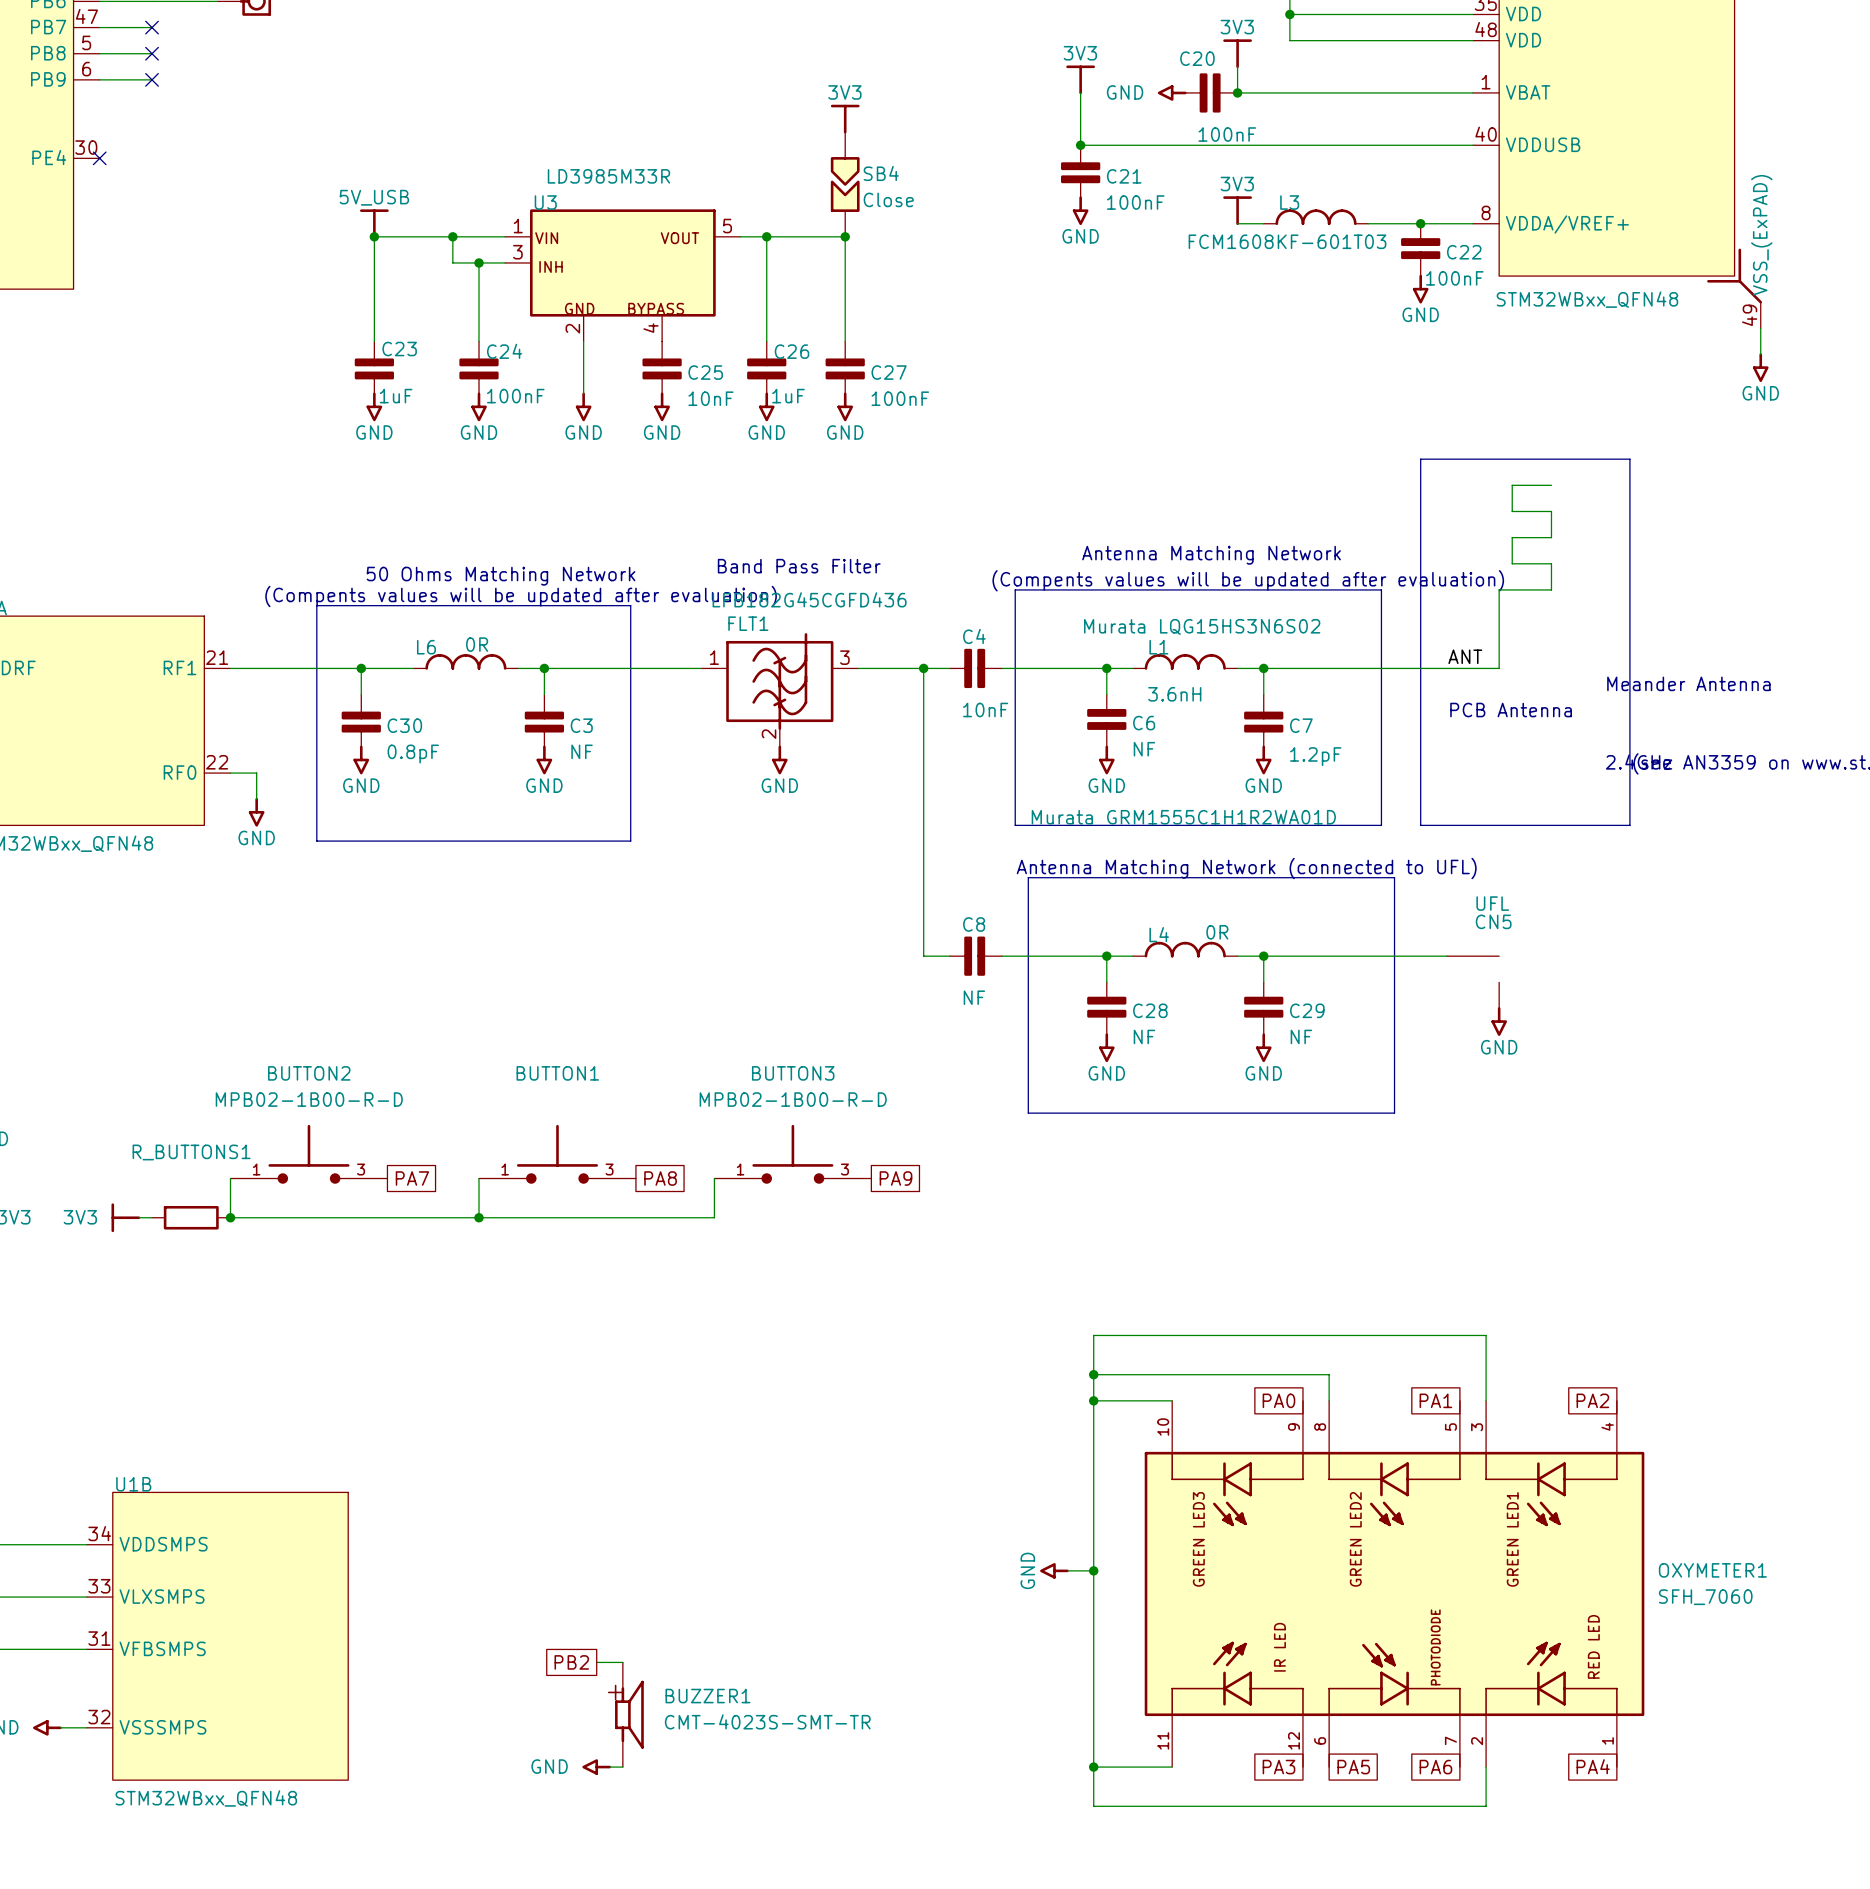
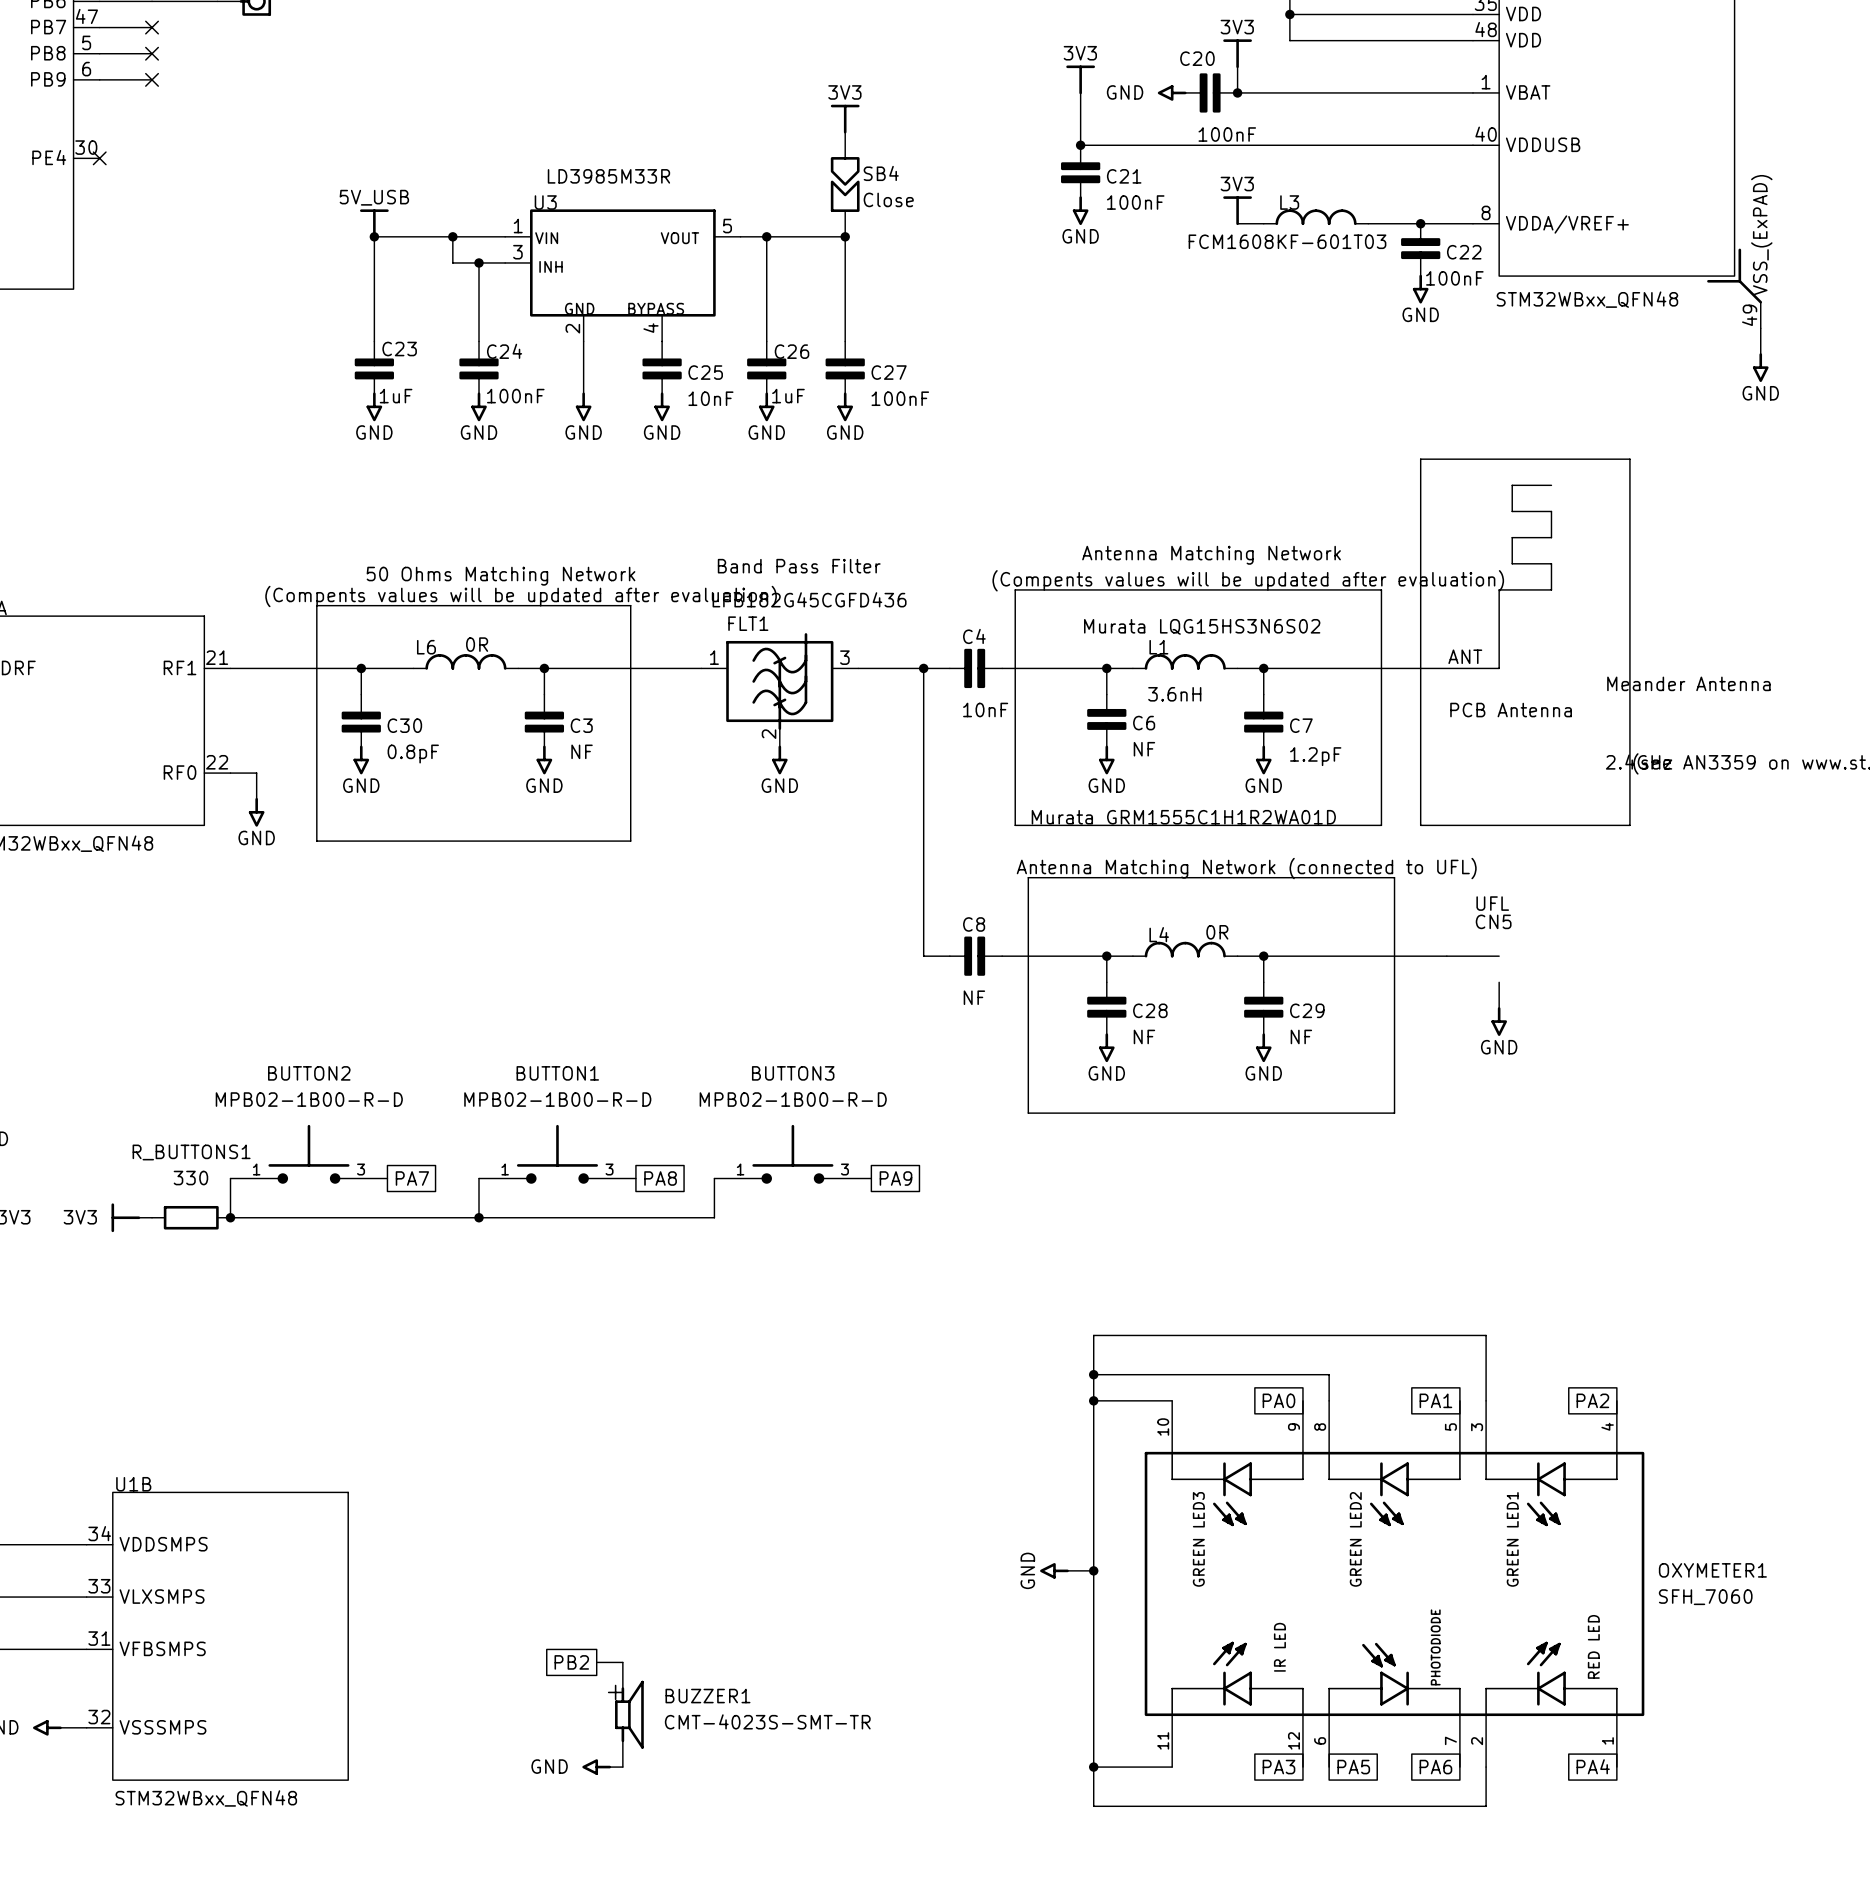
BUTTON1 value: none -> MPB02-1B00-R-D (557, 1099)
R_BUTTONS1 value: none -> 330 (190, 1178)

